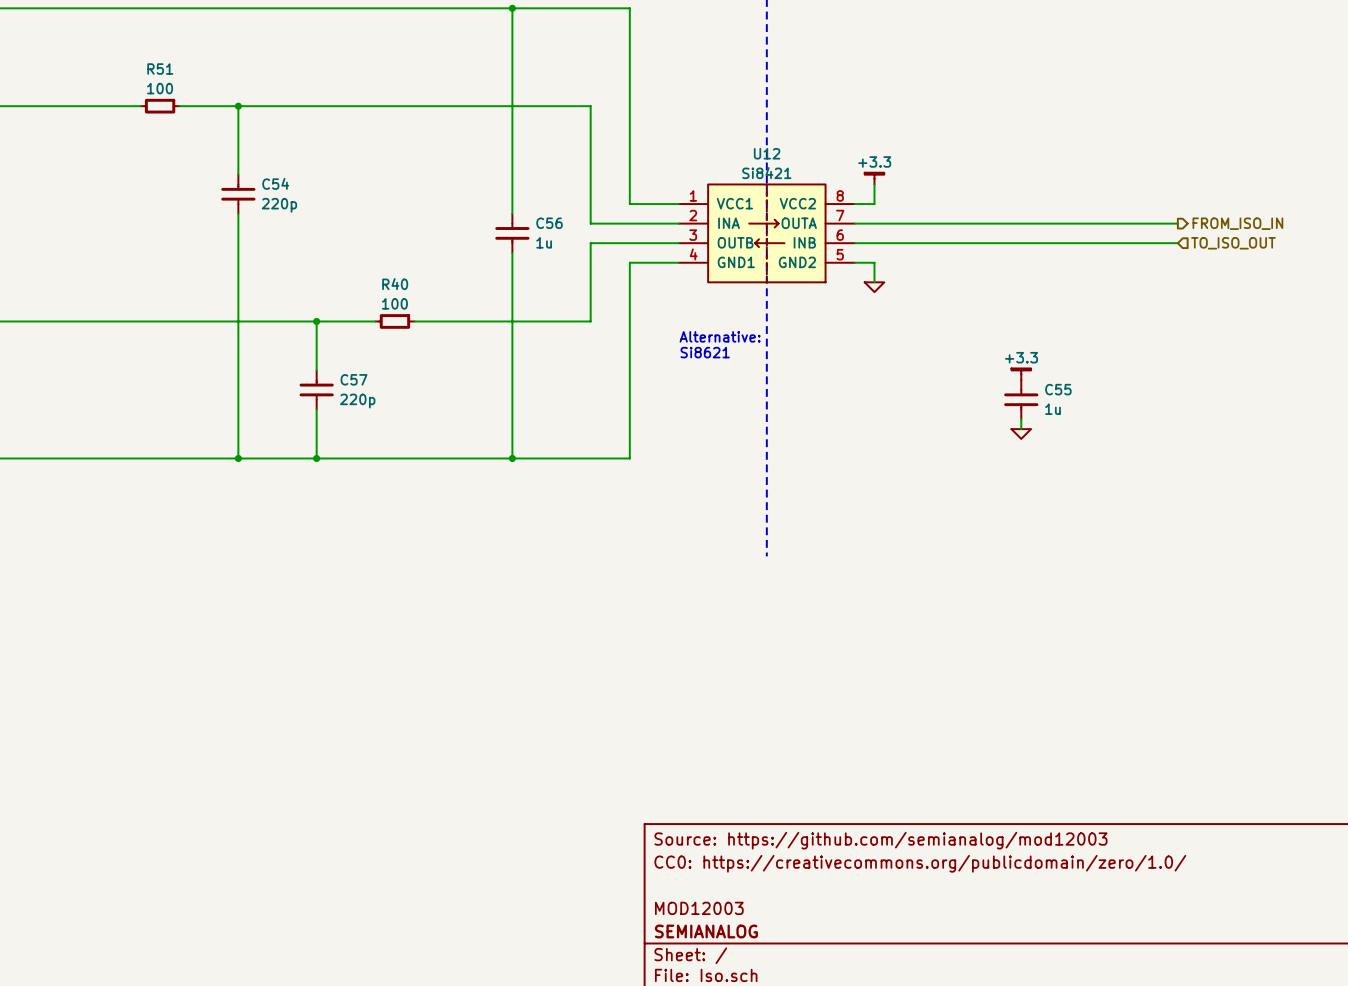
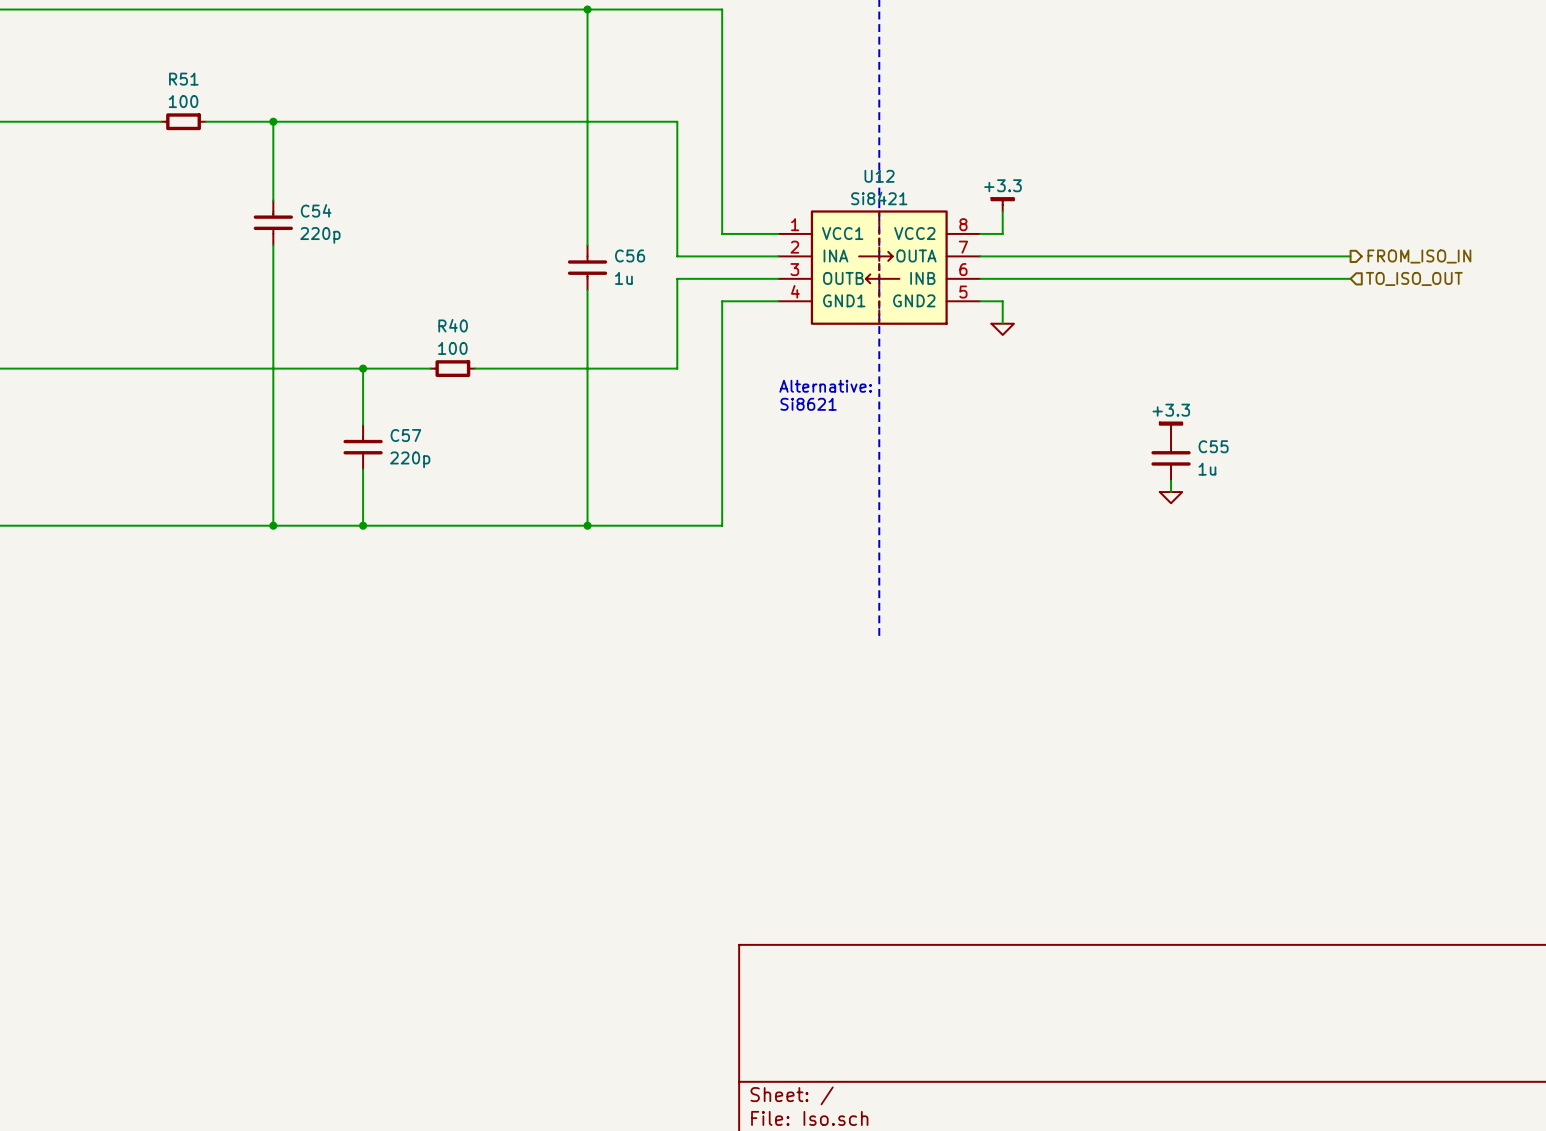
title block: Source: https://github.com/semianalog/mod12003 (880, 840) -> none
title block: CC0: https://creativecommons.org/publicdomain/zero/1.0/ (920, 863) -> none
title block: MOD12003 (699, 908) -> none
title block: SEMIANALOG (706, 931) -> none

